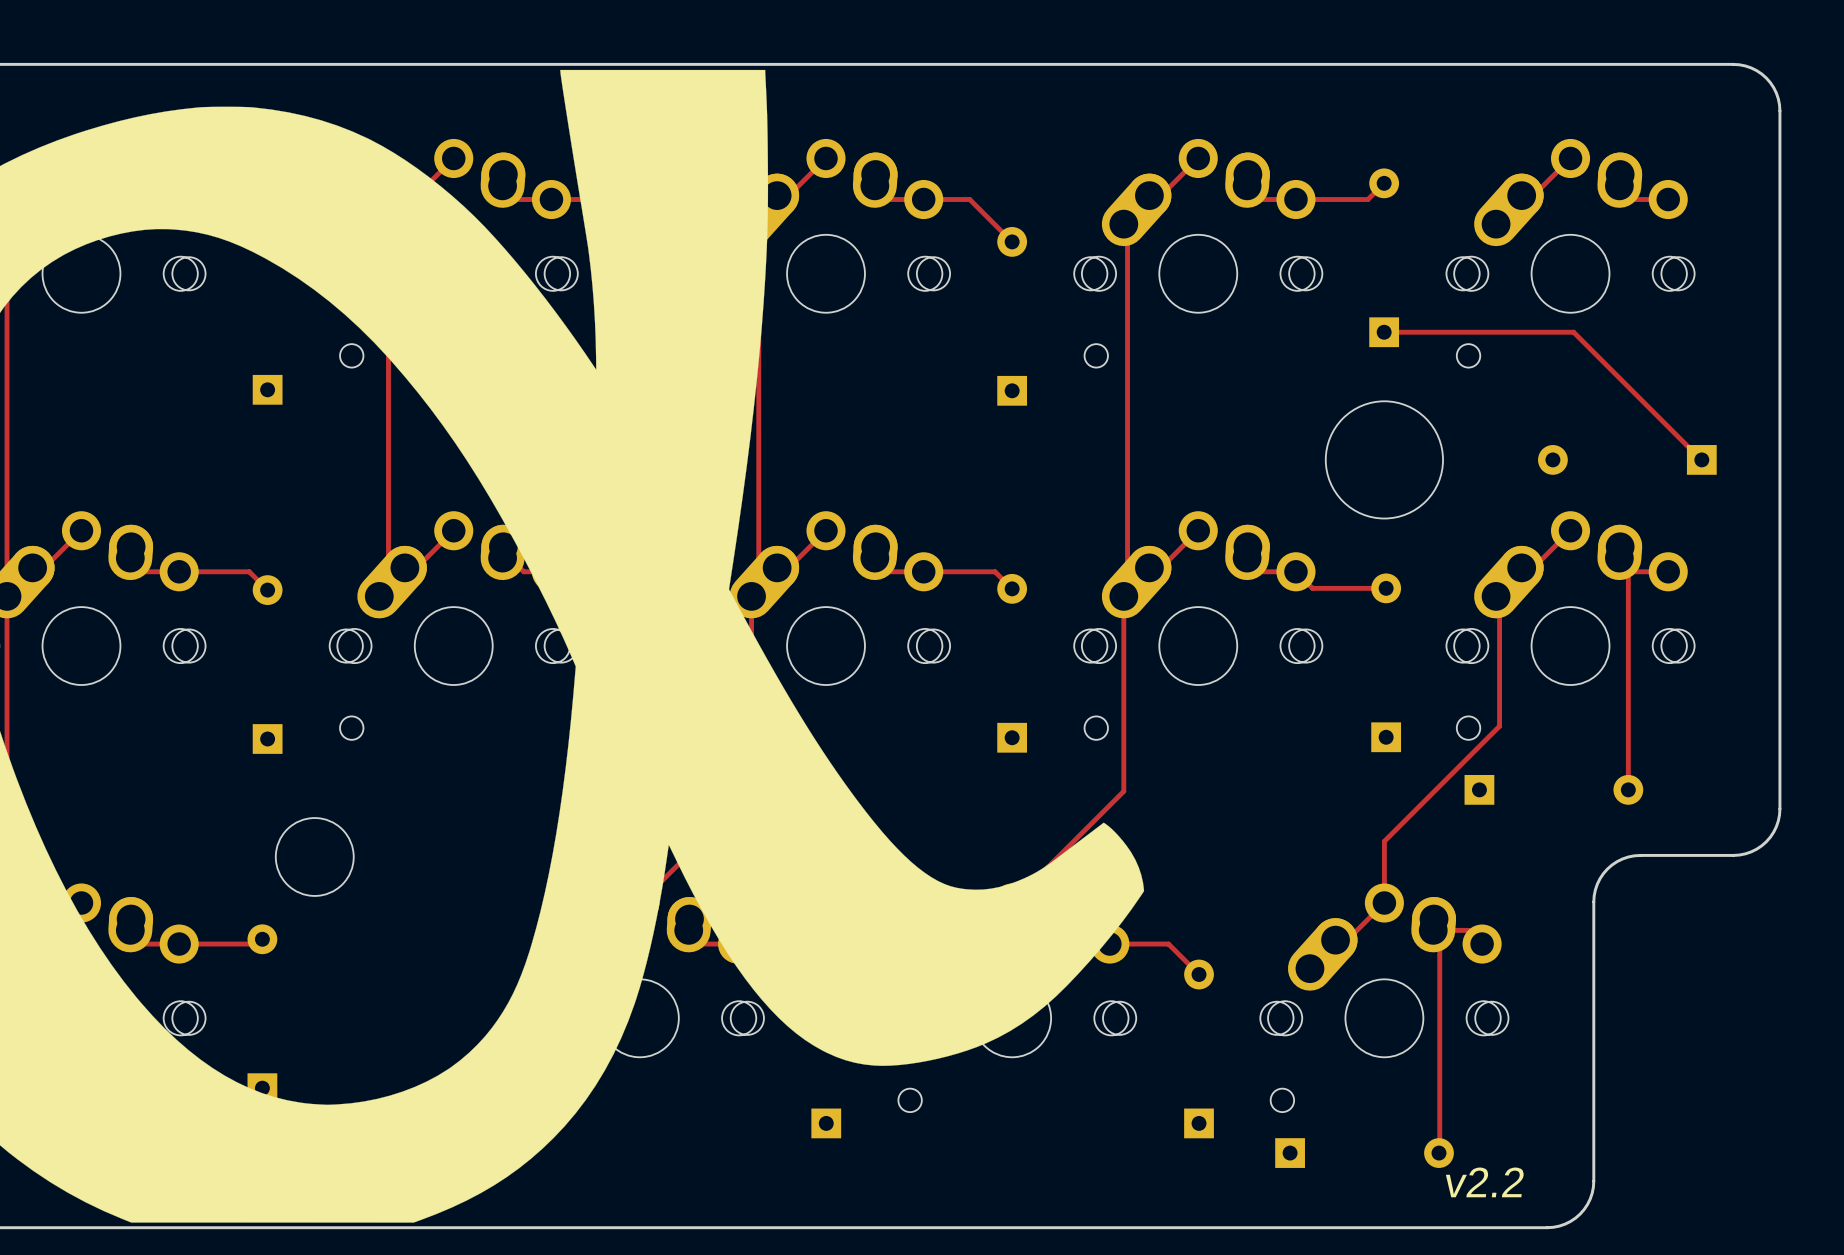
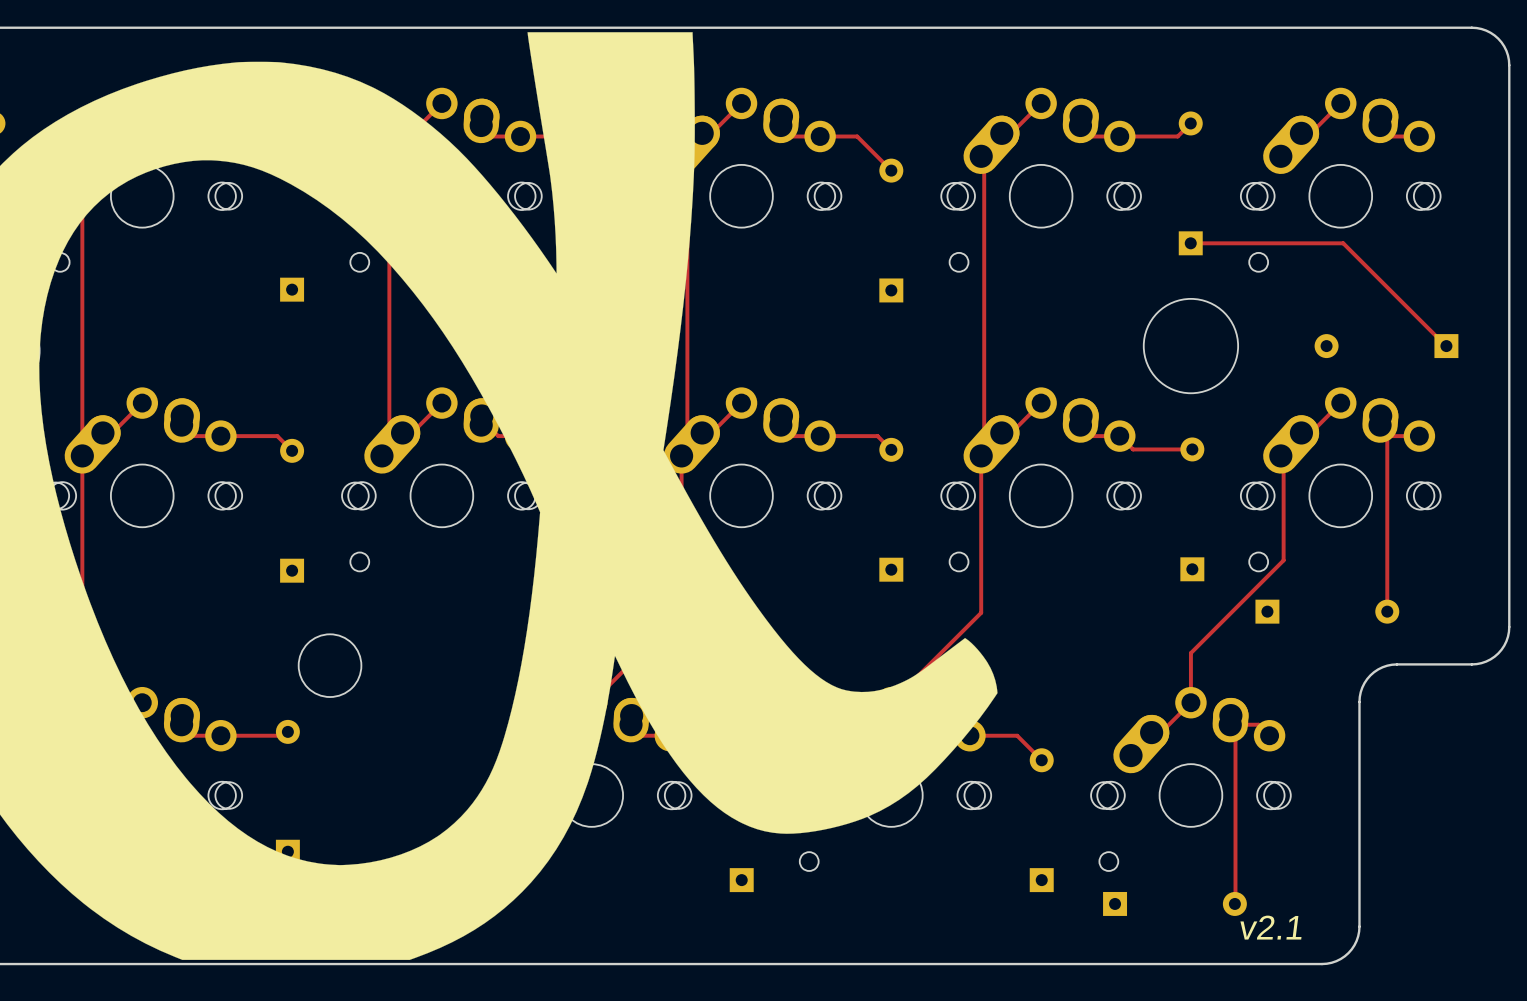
text: v2.2 (1484, 1182) -> v2.1 (1270, 927)

